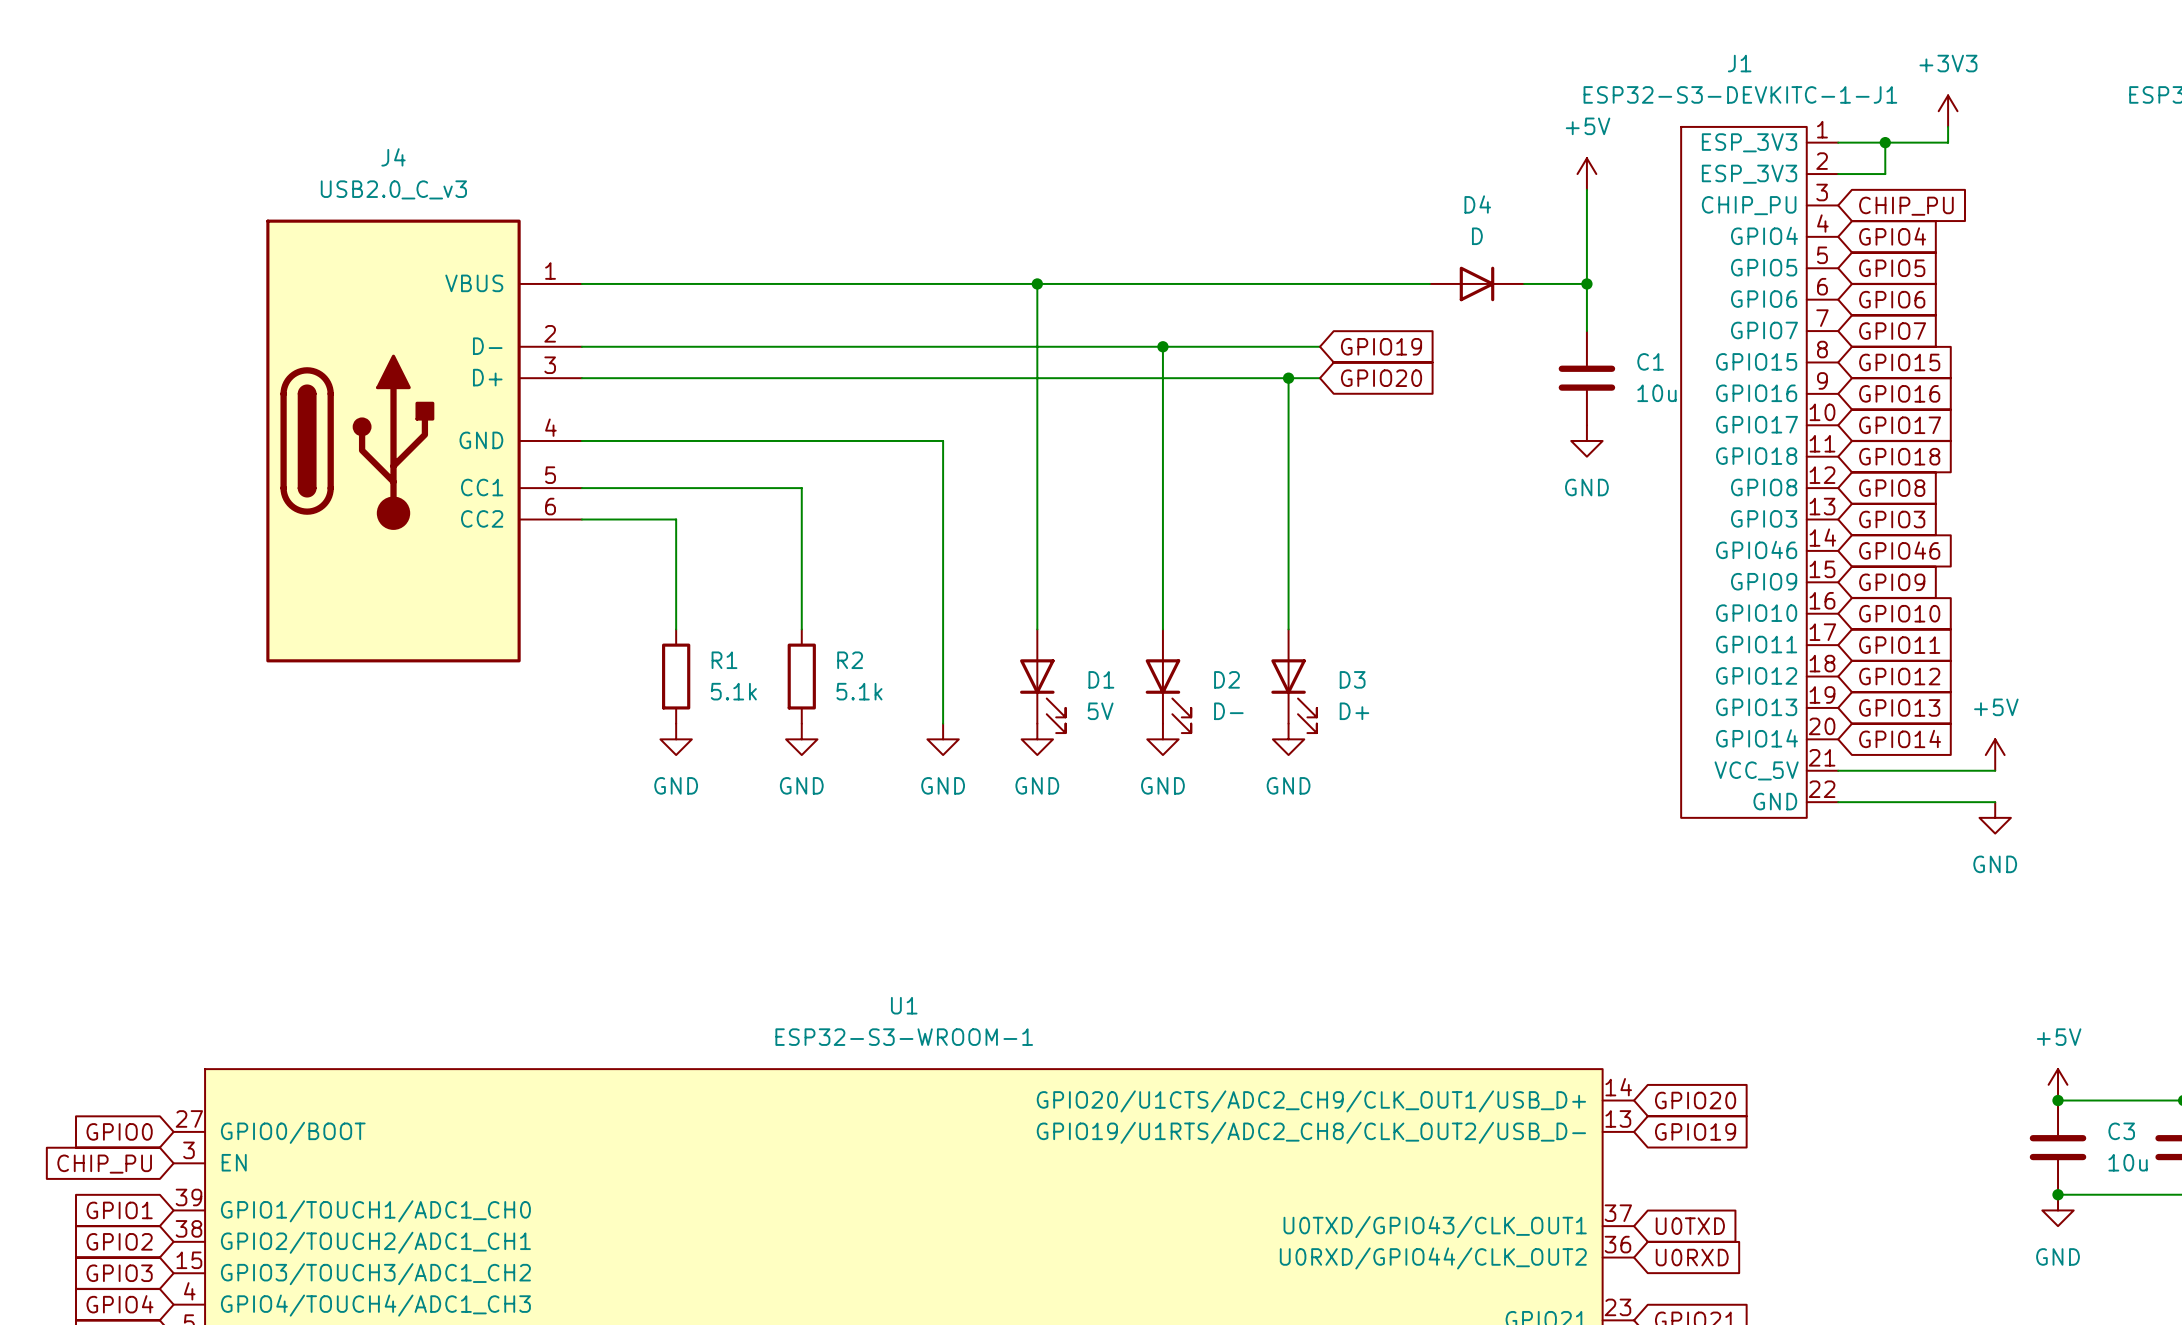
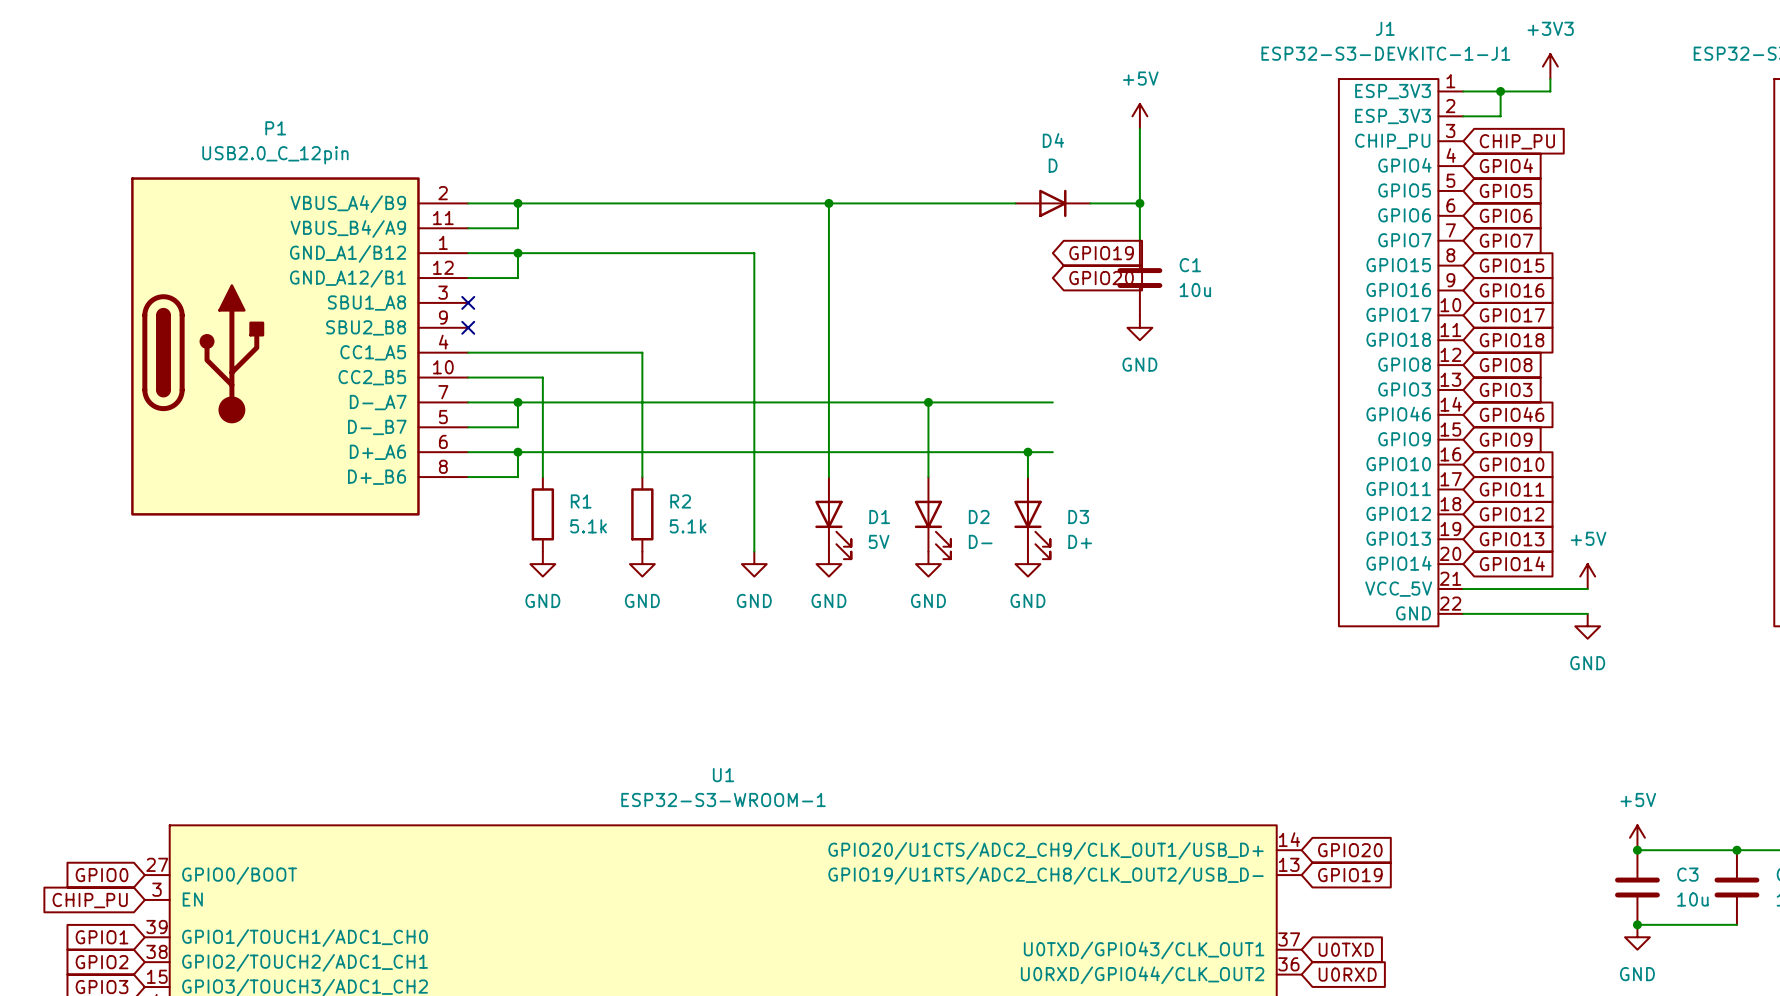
power symbol position: +5V (1586, 174) -> +5V (1139, 116)
wire: (1586, 189) (1586, 331) -> (1139, 128) (1139, 240)
wire: none -> (517, 203) (517, 228) (468, 228)
junction: none -> (517, 203)
junction: none -> (1139, 203)
D4 position: (1477, 283) -> (1052, 203)
wire: (1524, 283) (1586, 283) -> none
junction: (1586, 283) -> none
junction: none -> (517, 253)
wire: (943, 346) (1319, 346) -> none
wire: (1162, 346) (1162, 535) -> none
junction: (1162, 346) -> none
wire: (644, 378) (1319, 378) -> (517, 278) (517, 253)
wire: (1288, 378) (1288, 598) -> none
junction: (1288, 378) -> none
C1 position: (1586, 378) -> (1139, 278)
no-connect mark: none -> (468, 302)
J4: USB2.0_C_v3 (424, 440) -> none
wire: (581, 440) (943, 440) -> (754, 253) (754, 327)
no-connect mark: none -> (468, 327)
power symbol position: GND (1586, 440) -> GND (1139, 327)
P1: none -> USB2.0_C_12pin (299, 346)
wire: (581, 488) (801, 488) -> (468, 352) (642, 352) (642, 365)
wire: (581, 519) (676, 519) -> (468, 377) (542, 377) (542, 389)
wire: none -> (468, 402) (1052, 402)
wire: none -> (517, 402) (517, 427) (468, 427)
junction: none -> (517, 402)
junction: none -> (928, 402)
wire: none -> (468, 452) (1052, 452)
wire: none -> (517, 452) (517, 477) (468, 477)
junction: none -> (517, 452)
junction: none -> (1027, 452)

